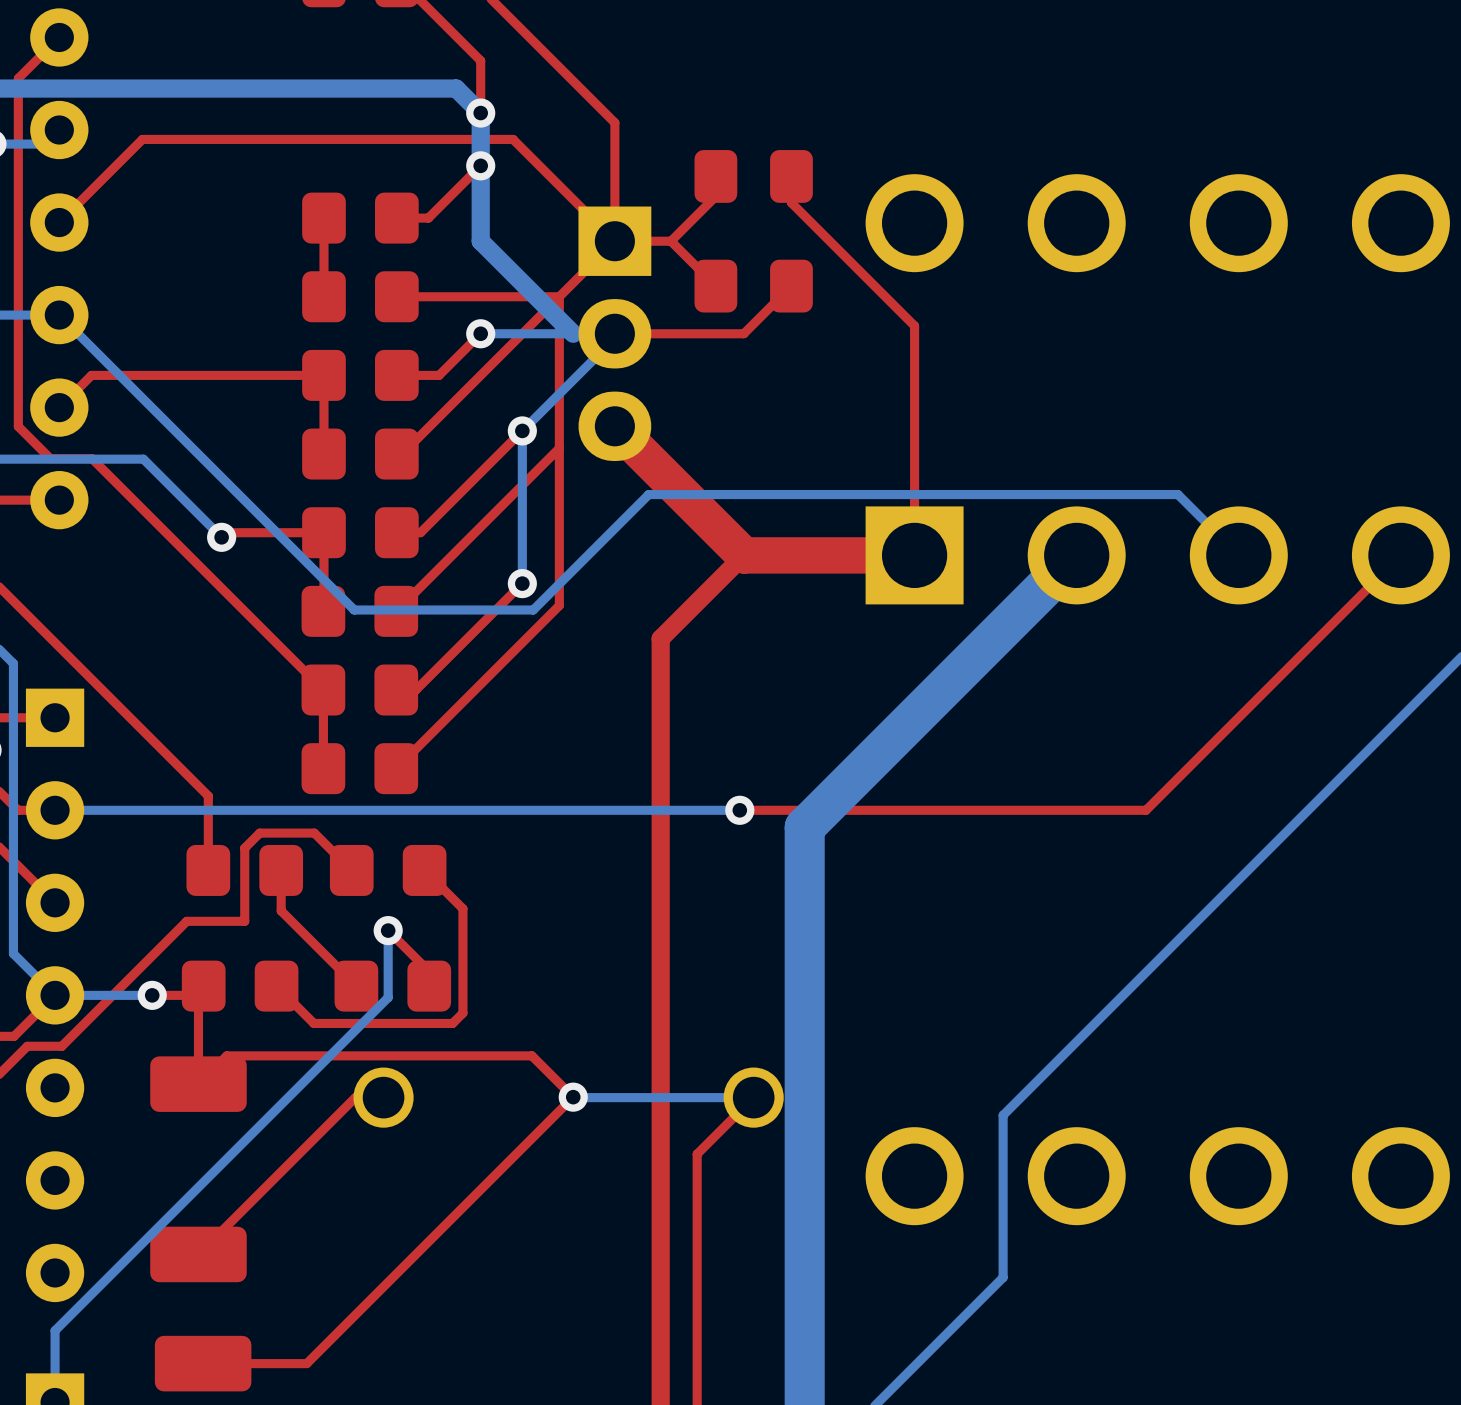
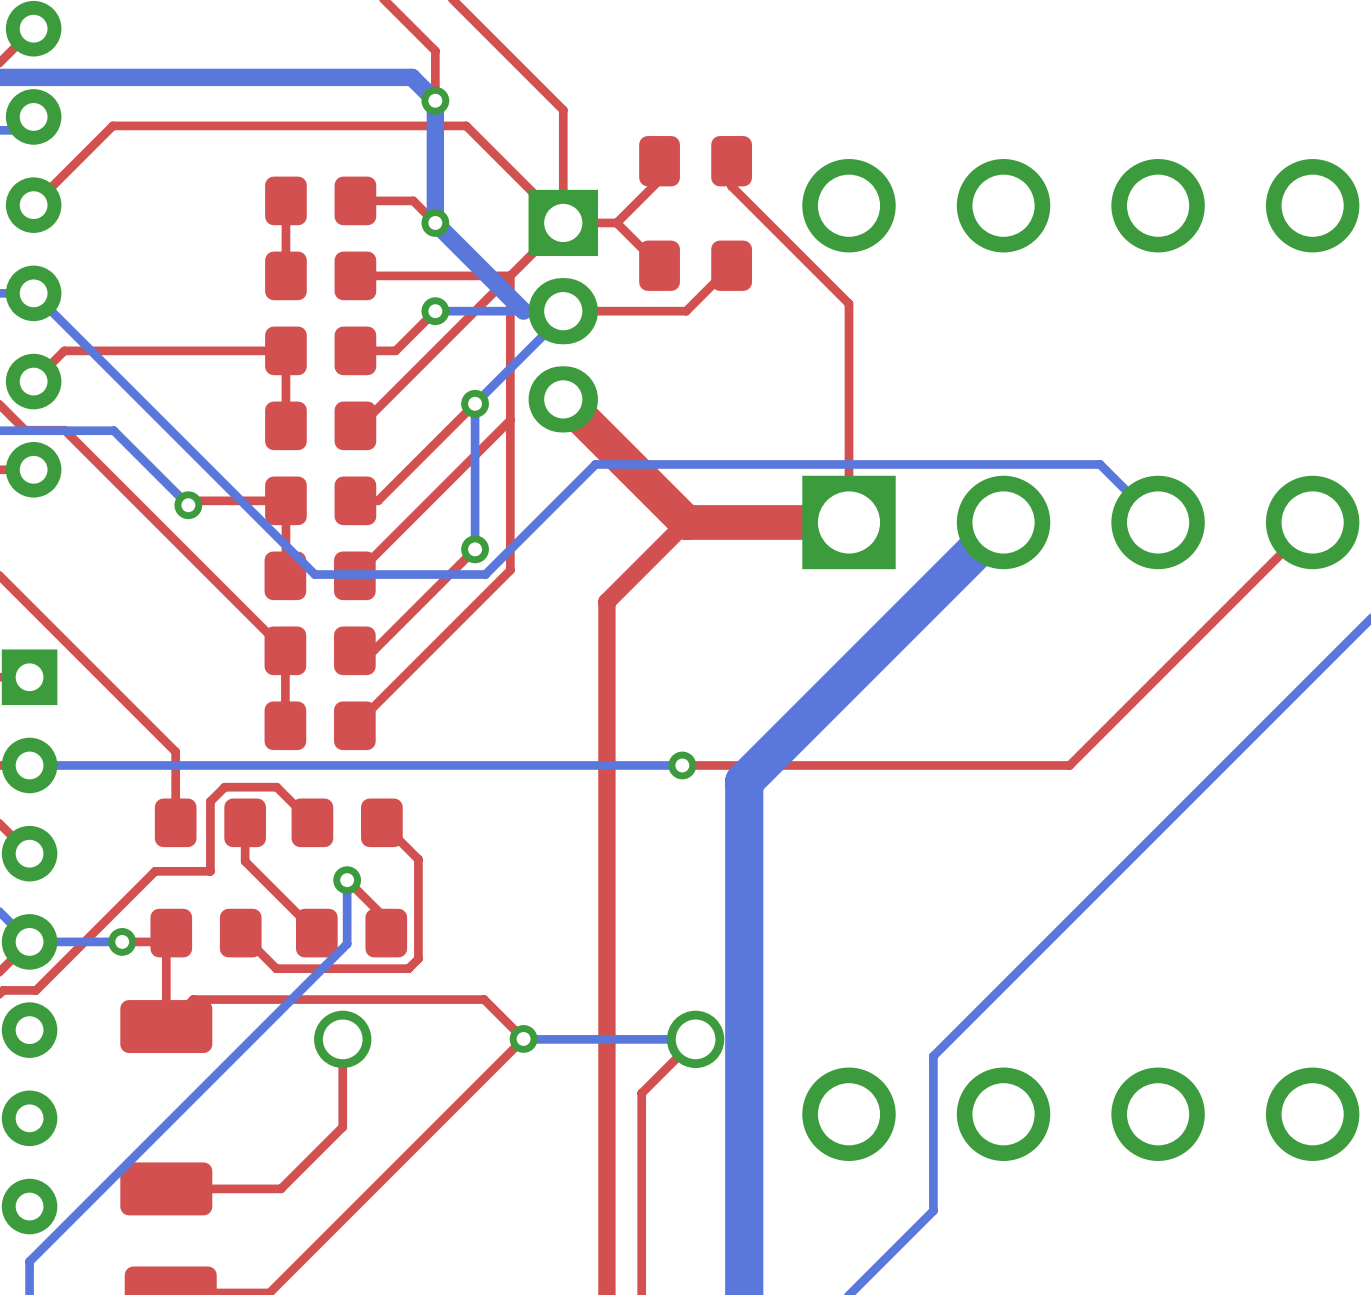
top track: (480, 165) (428, 218) -> (435, 222) (413, 200) (385, 200)
via position: (480, 165) -> (435, 222)
top track: (383, 1097) (355, 1097) (198, 1254) -> (342, 1039) (342, 1127) (280, 1188) (166, 1188)

